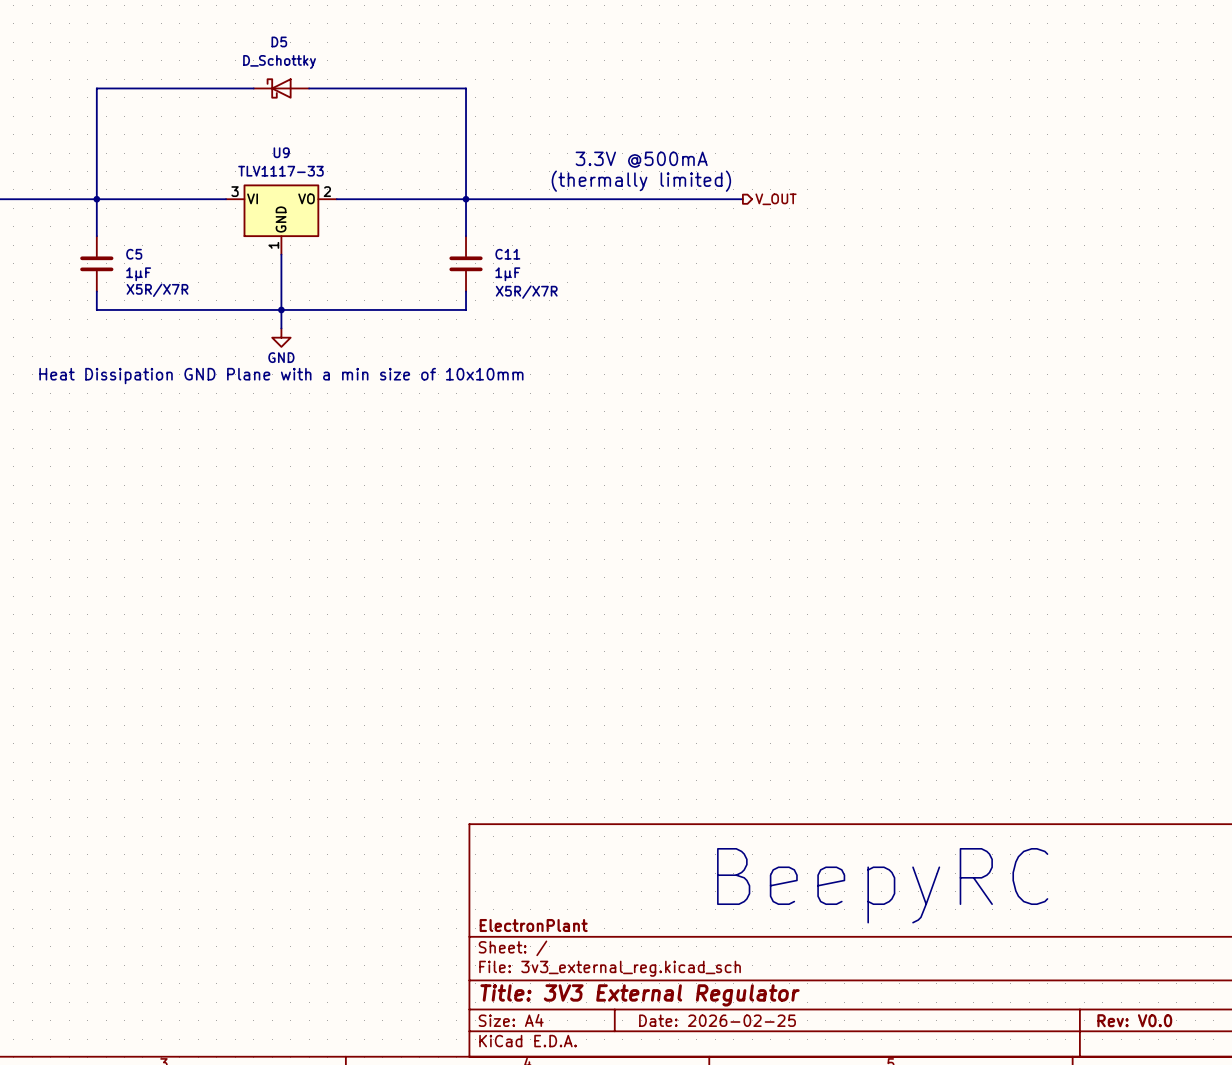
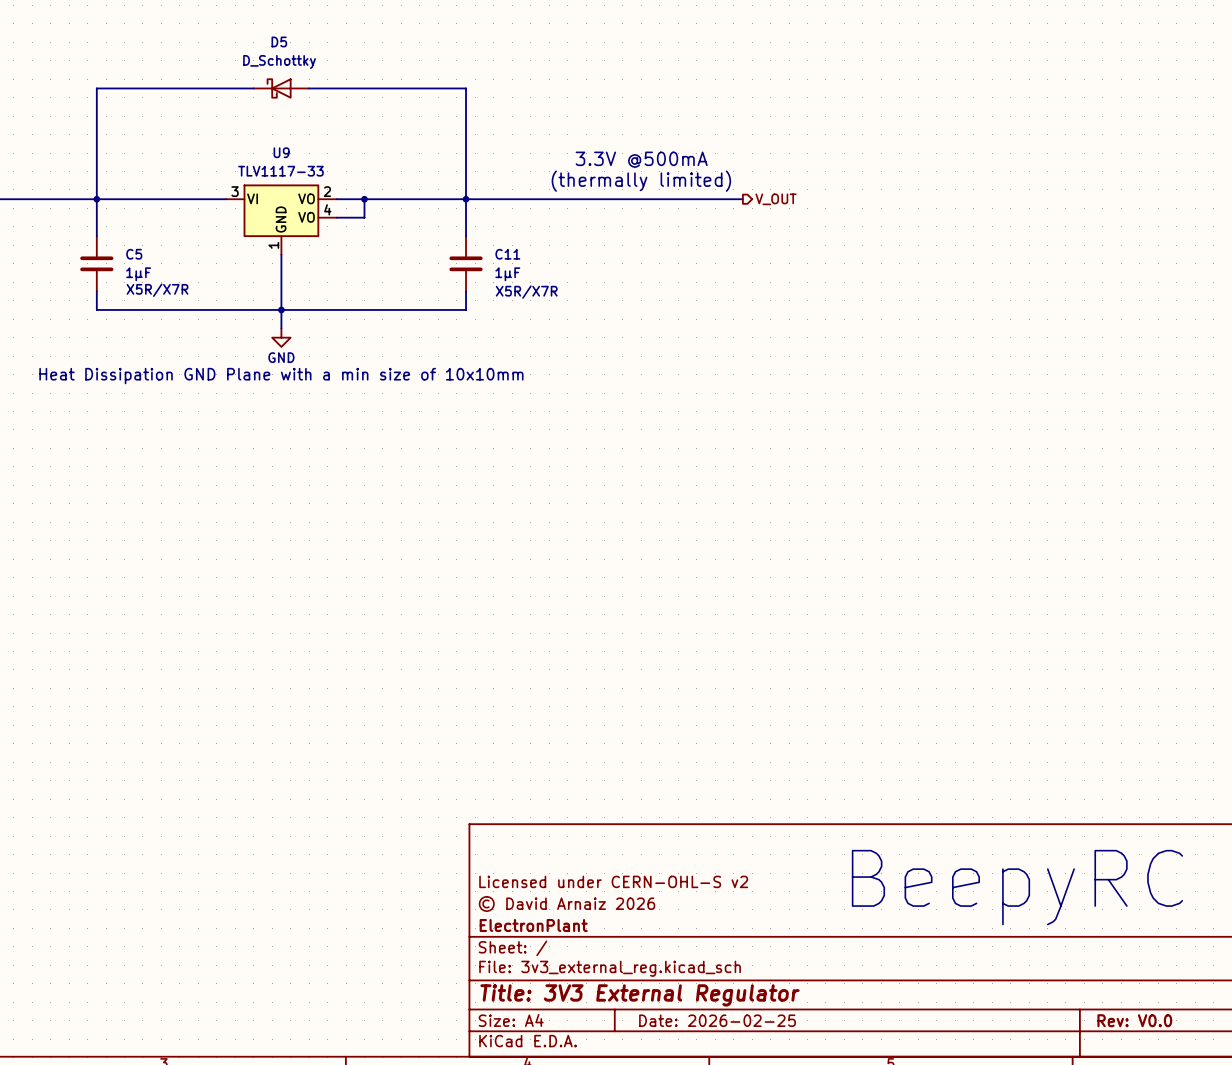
U9 symbol: [226, 184, 337, 255] -> [226, 184, 337, 255]
wire: none -> (364, 199) (364, 217) (336, 217)
junction: none -> (364, 199)
title block: none -> Licensed under CERN-OHL-S v2 (613, 881)
text position: BeepyRC (882, 885) -> BeepyRC (1017, 887)
title block: none -> © David Arnaiz 2026 (566, 903)

